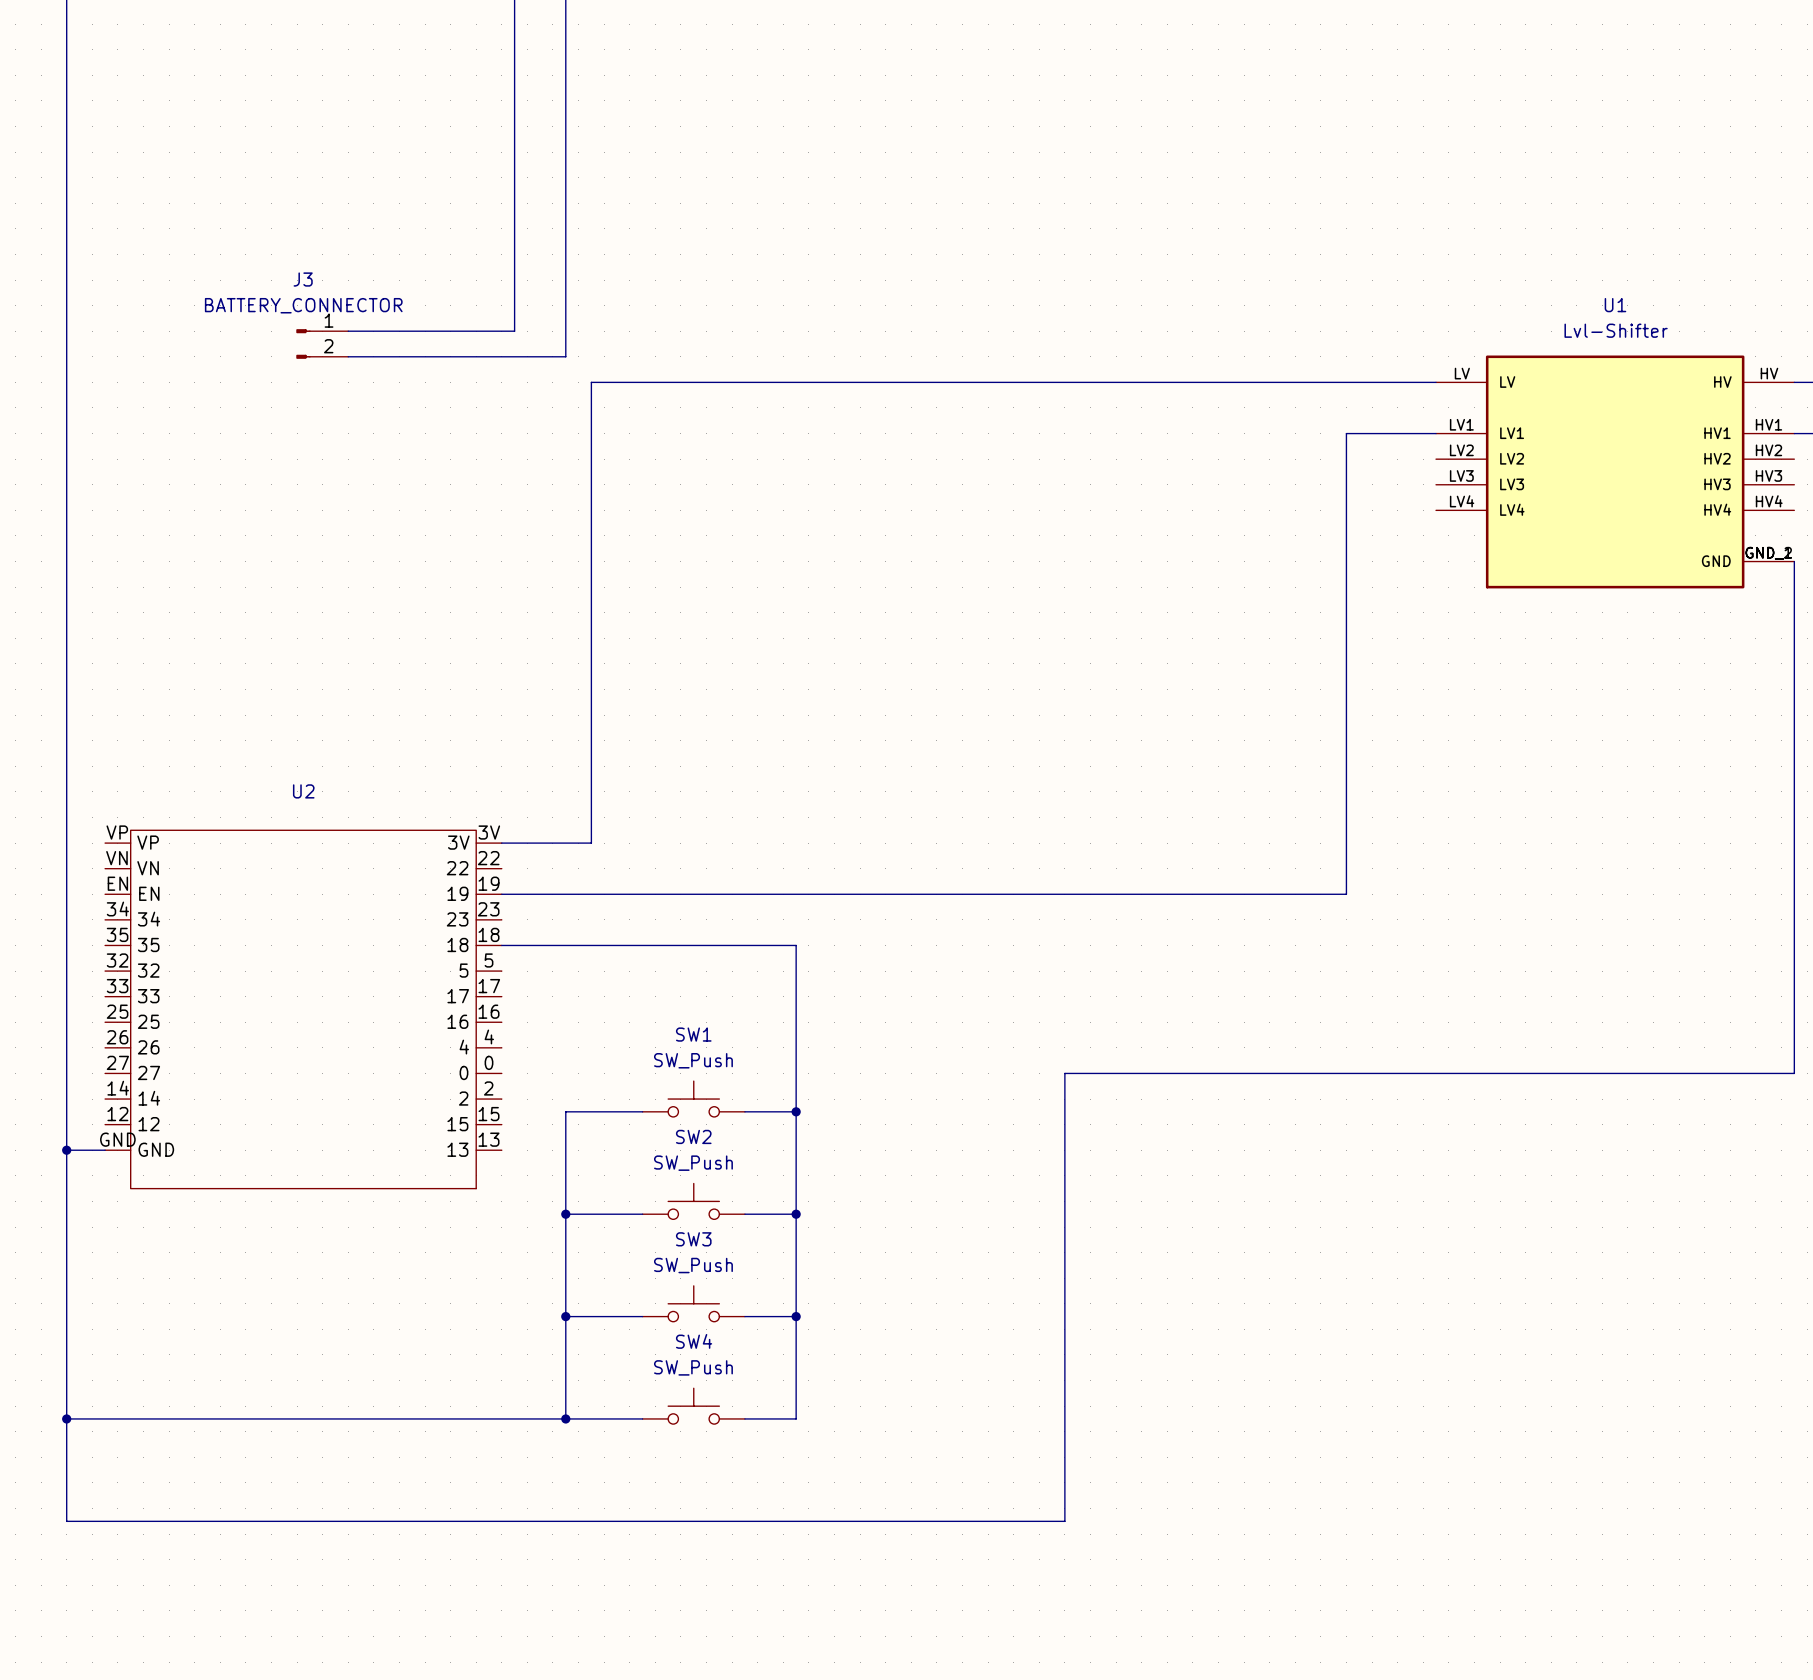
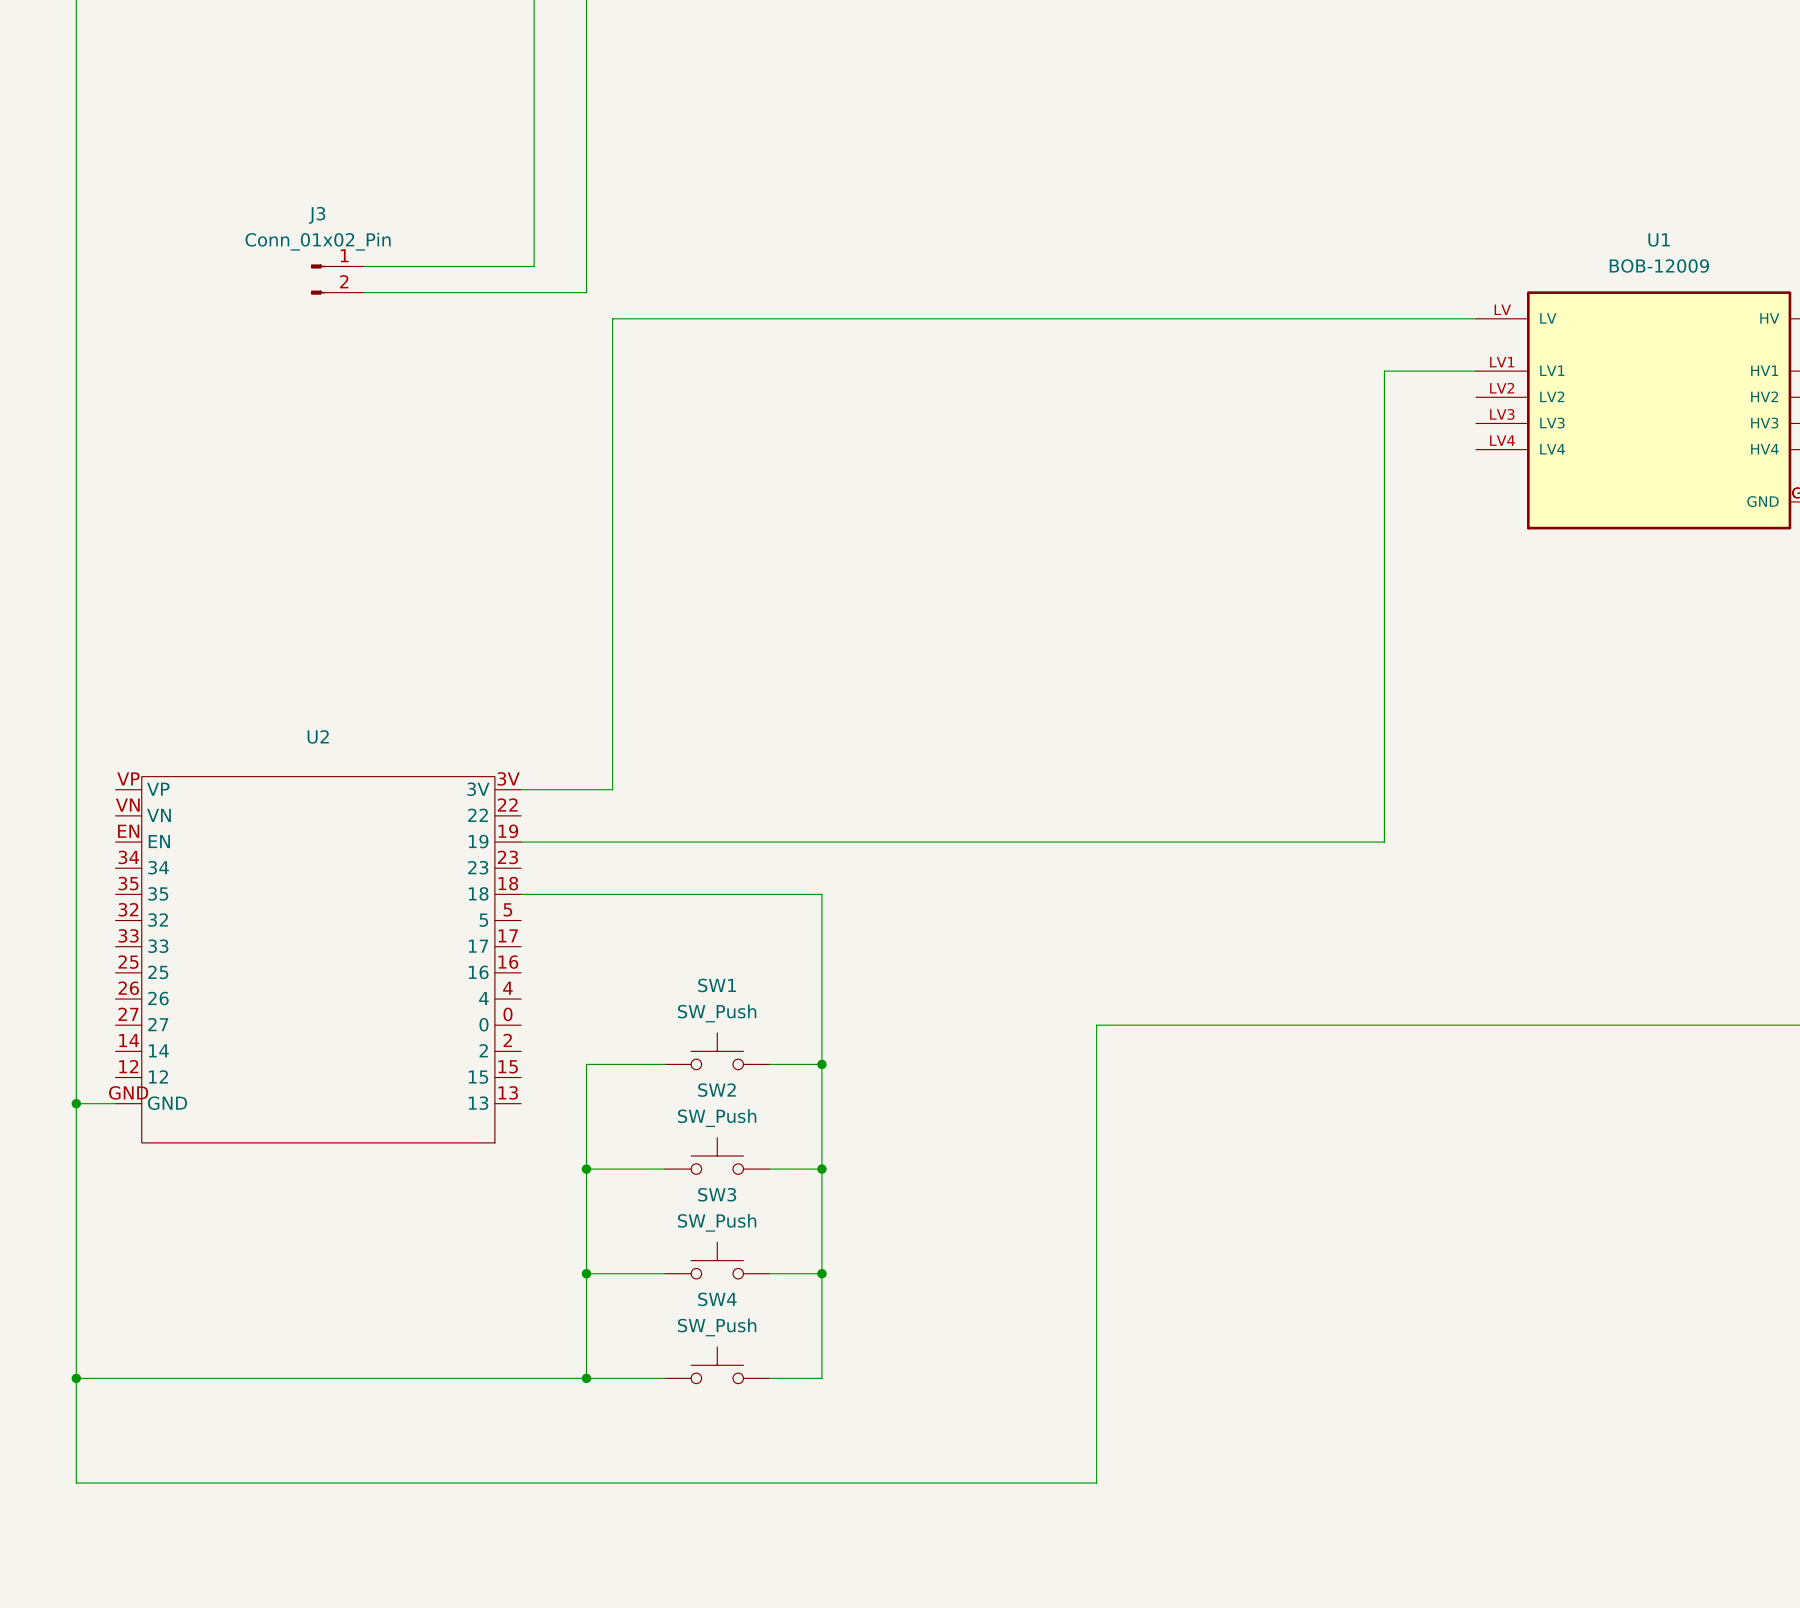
J3 value: BATTERY_CONNECTOR (303, 305) -> Conn_01x02_Pin (318, 241)
U1 value: Lvl-Shifter (1616, 330) -> BOB-12009 (1659, 266)

